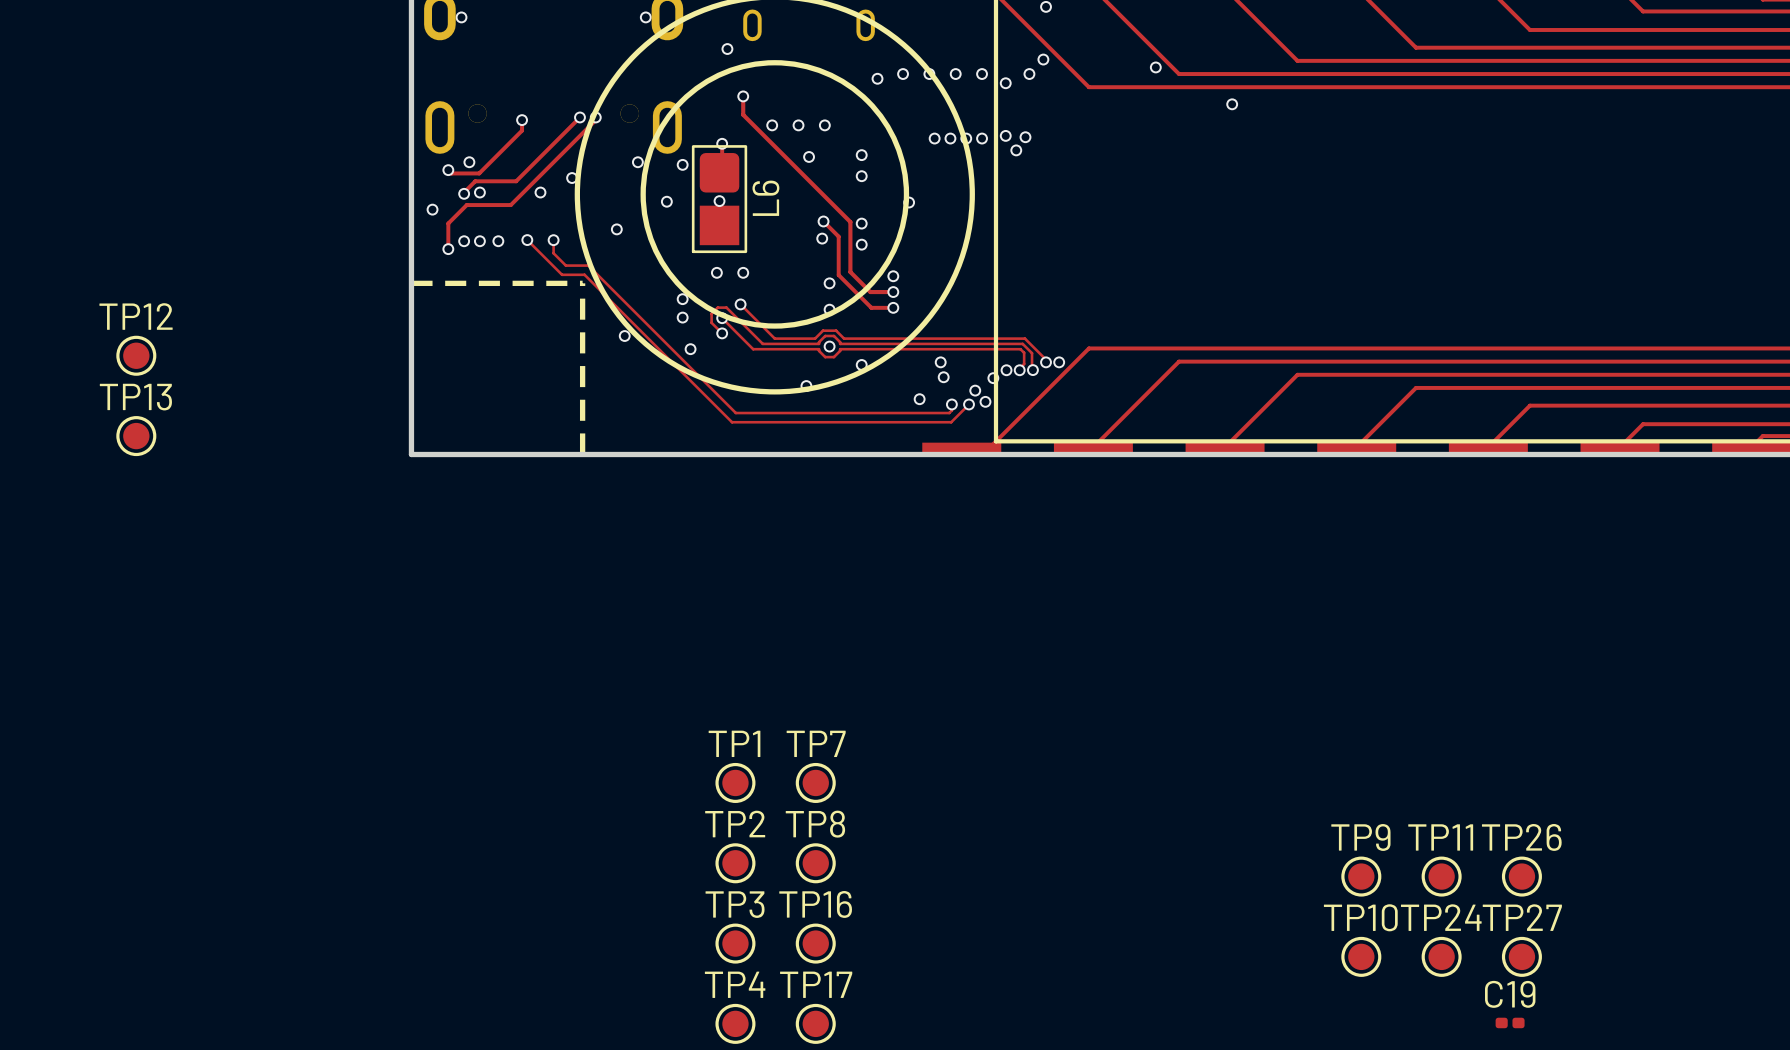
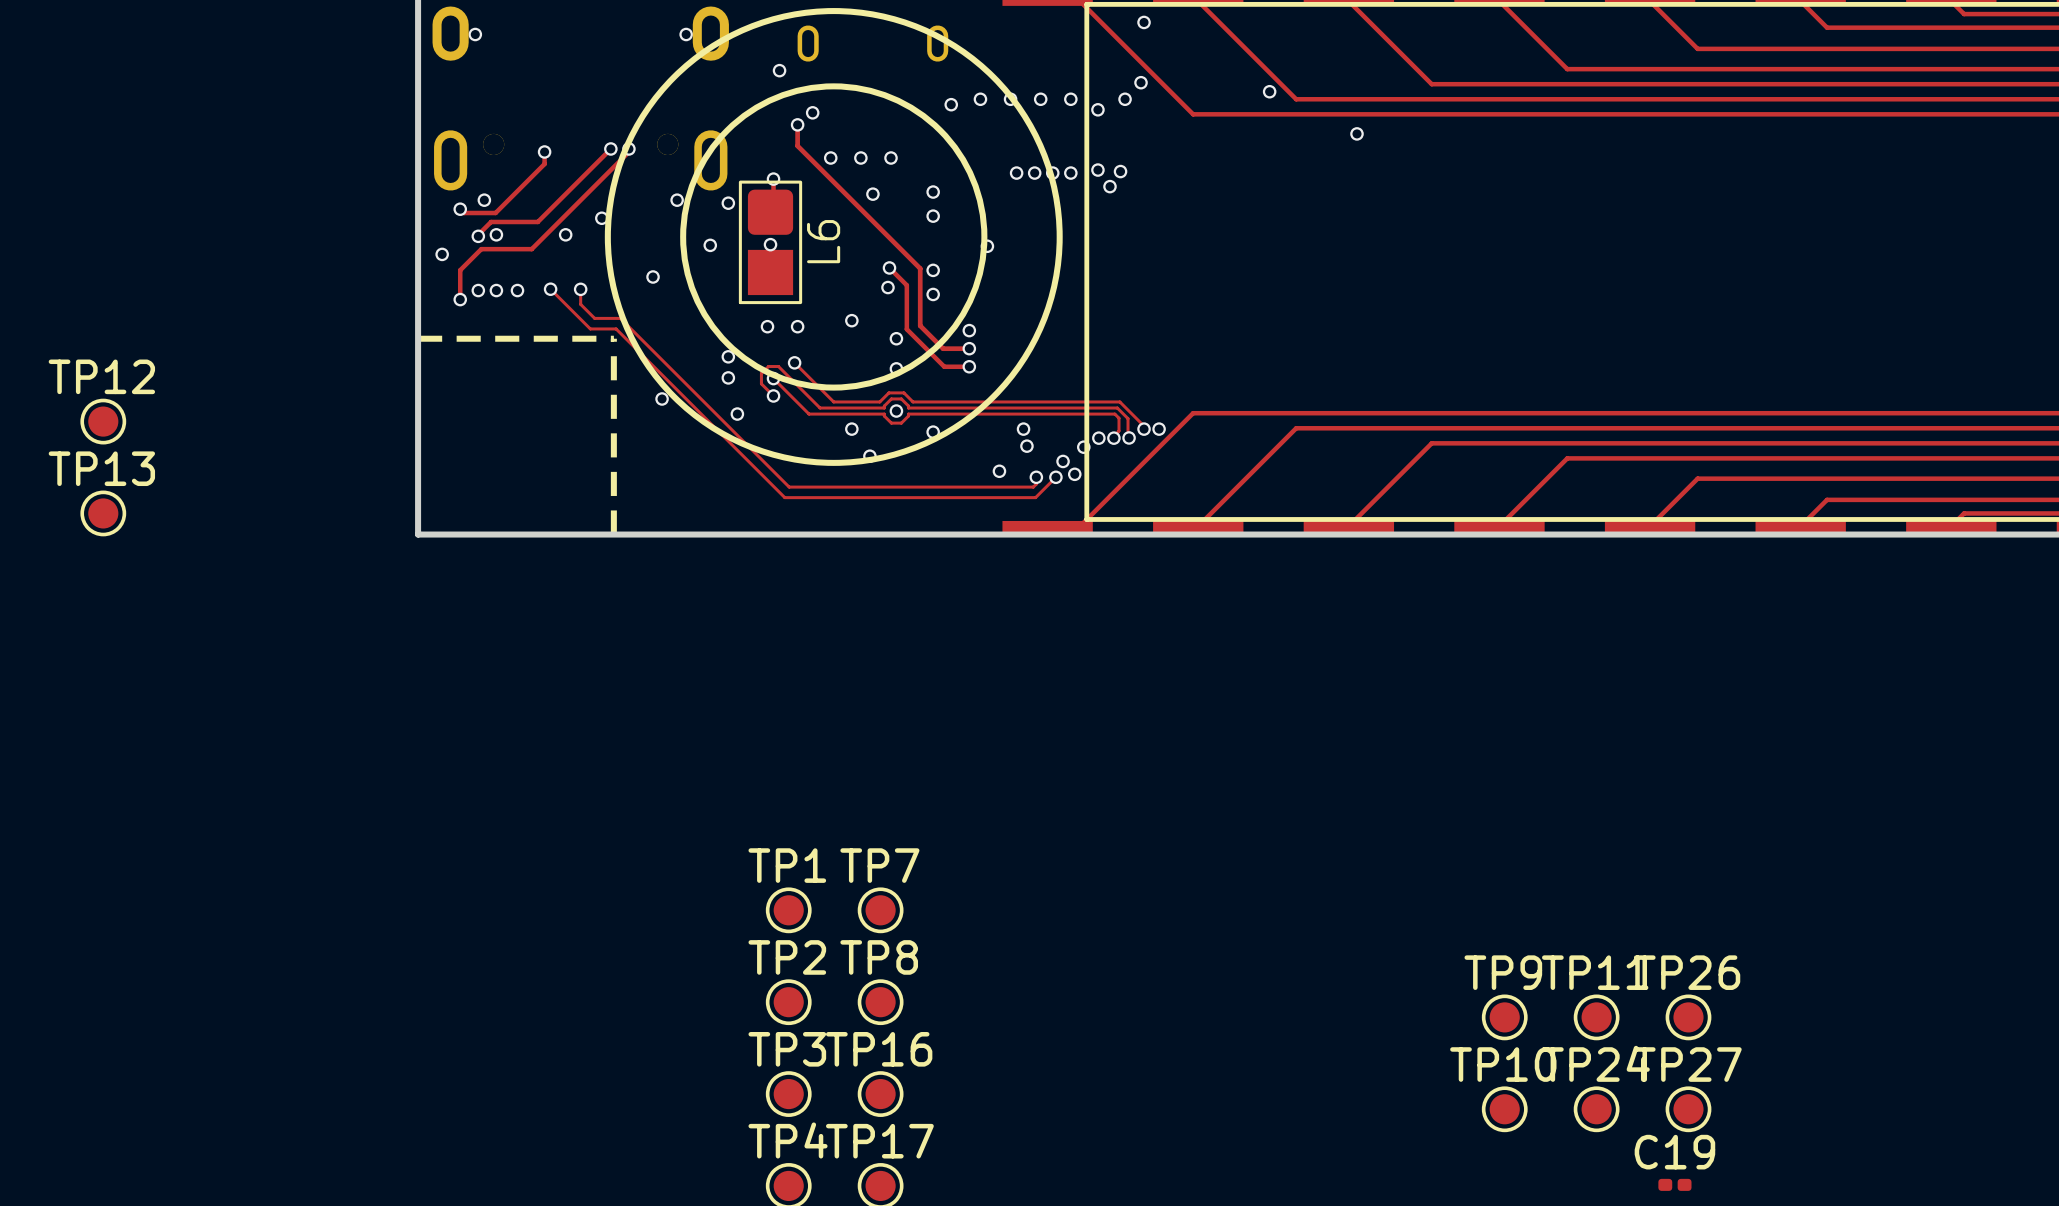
via: none -> (812, 112)
via: none -> (851, 320)
via: none -> (851, 429)

